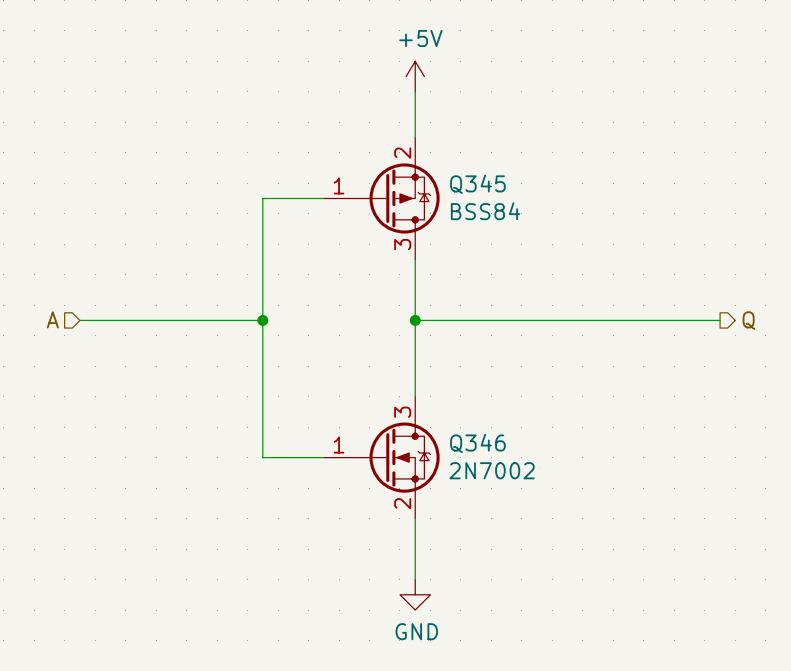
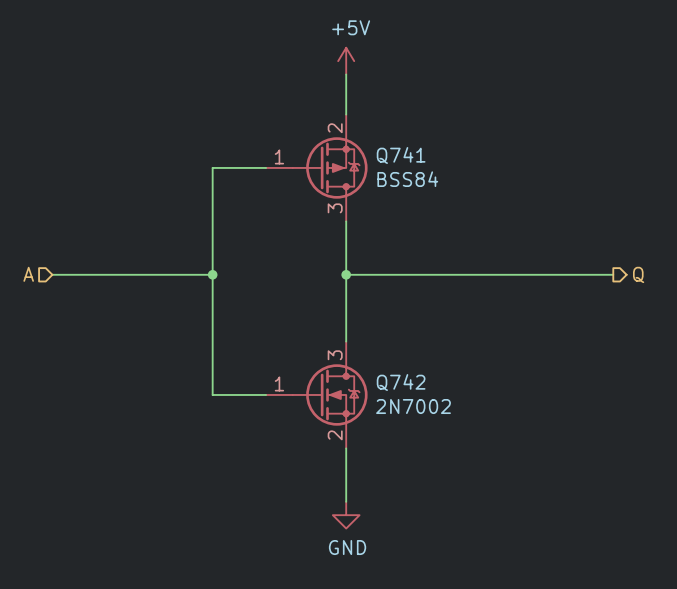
Q345 name: Q345 (477, 184) -> Q741 (401, 155)
Q346 name: Q346 (477, 443) -> Q742 (401, 382)

